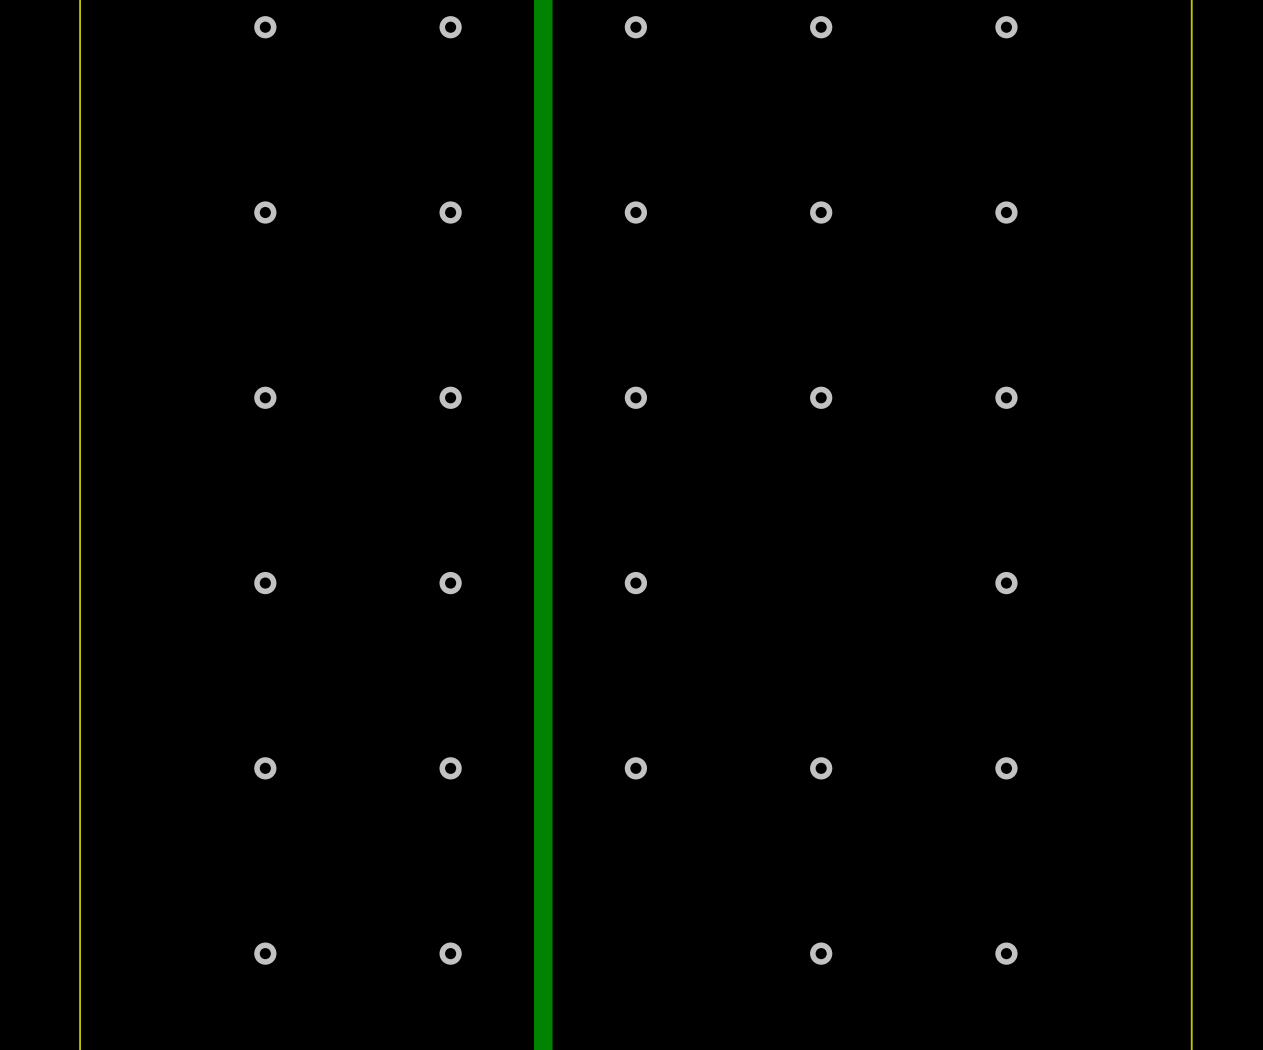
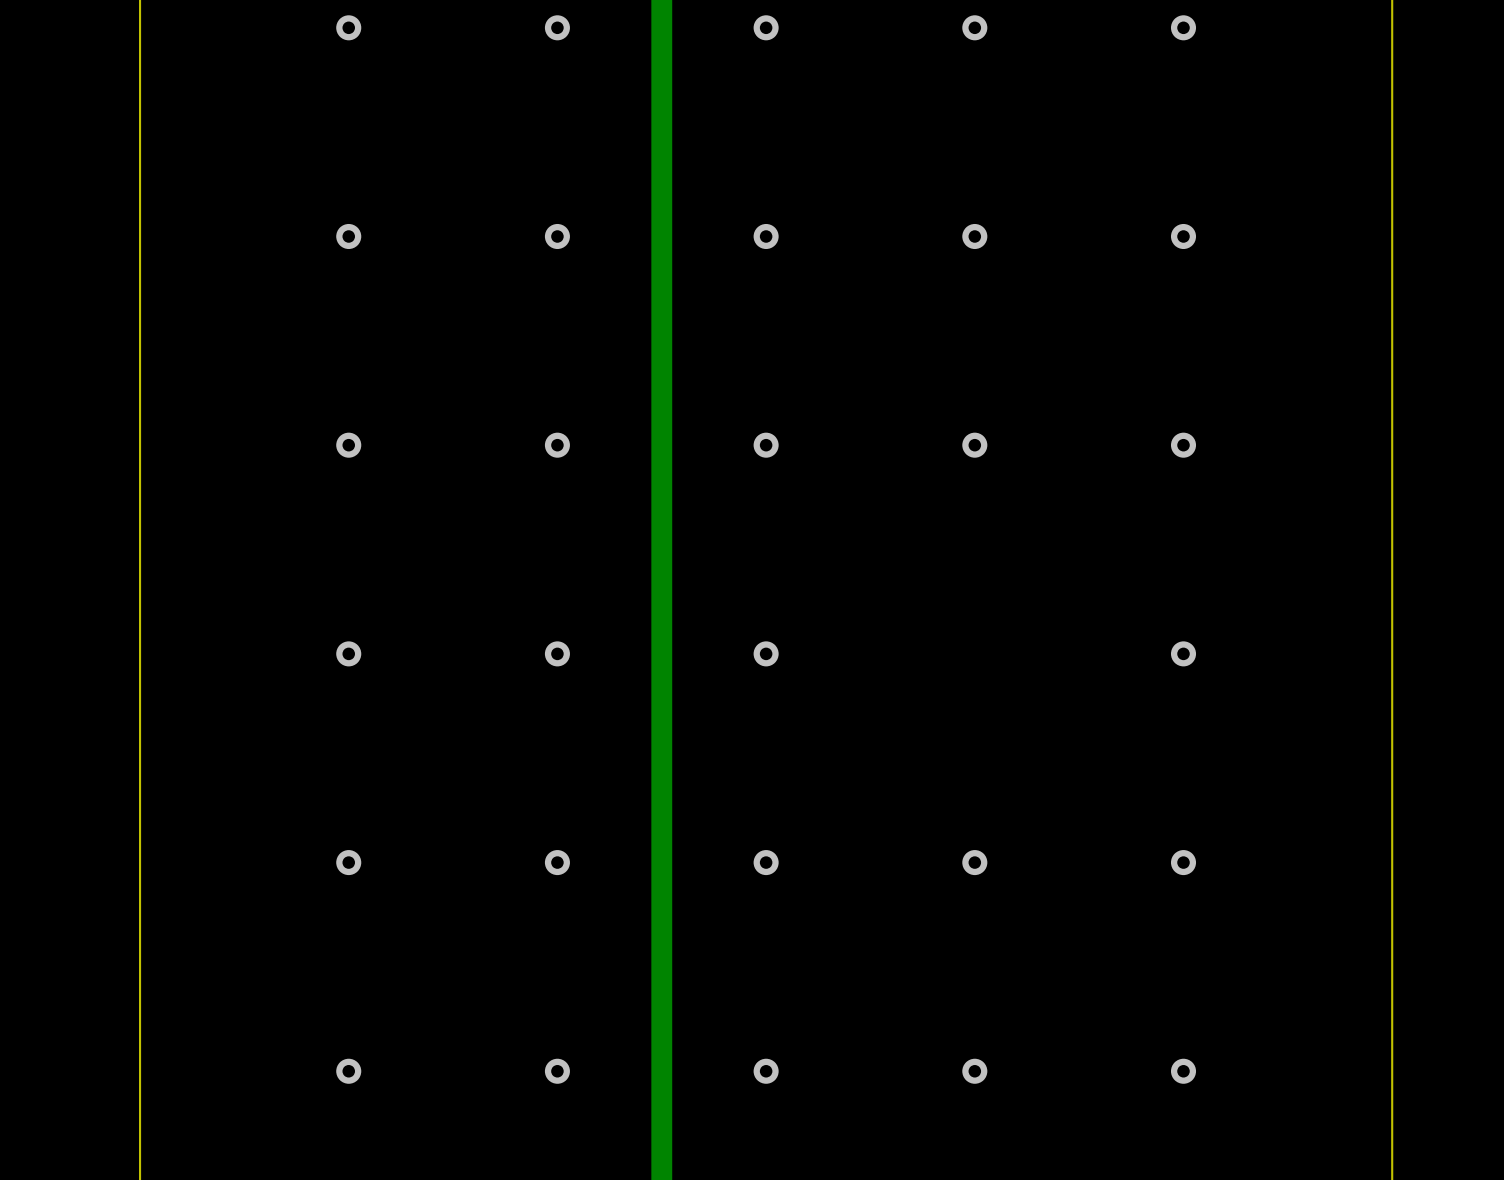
via: none -> (766, 1071)

